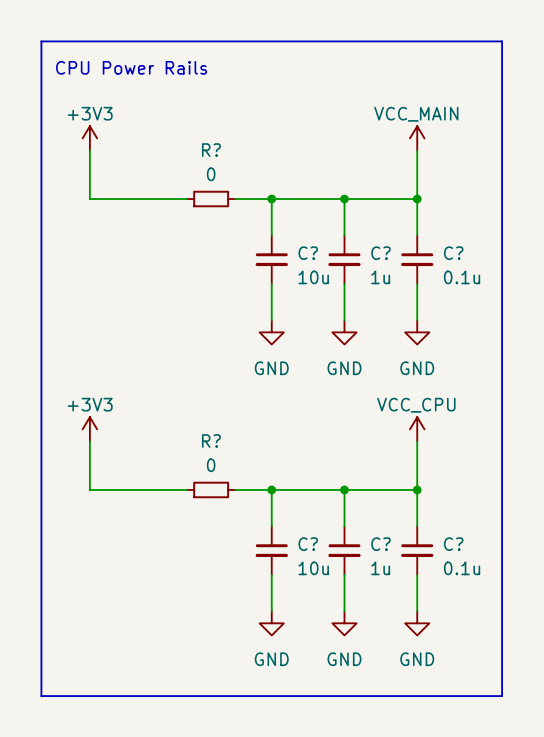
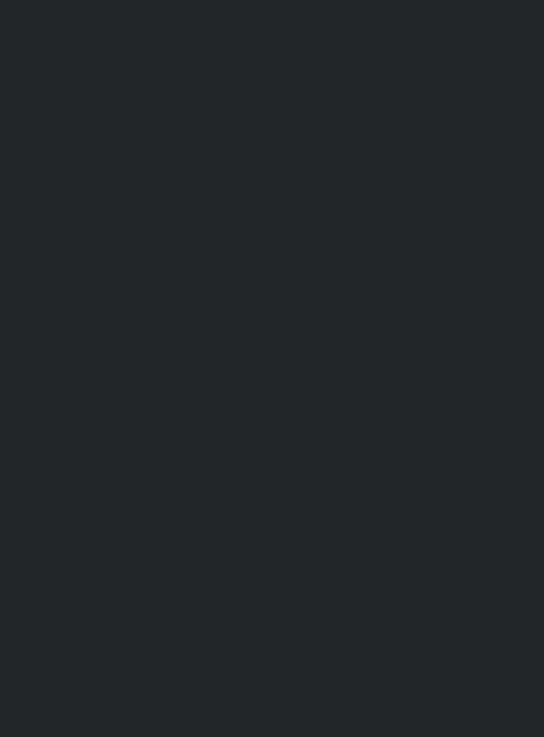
line: (41, 41) (502, 41) (502, 696) (41, 696) (41, 41) -> none
text: CPU Power Rails (131, 67) -> none
power symbol: +3V3 (89, 138) -> none
power symbol: VCC_MAIN (417, 138) -> none
wire: (89, 150) (89, 199) (186, 199) -> none
wire: (417, 150) (417, 235) -> none
R?: 0 (211, 199) -> none
wire: (235, 199) (417, 199) -> none
wire: (271, 199) (271, 235) -> none
junction: (271, 199) -> none
wire: (344, 199) (344, 235) -> none
junction: (344, 199) -> none
junction: (417, 199) -> none
C?: 10u (271, 259) -> none
C?: 1u (344, 259) -> none
C?: 0.1u (417, 259) -> none
wire: (271, 283) (271, 320) -> none
wire: (344, 283) (344, 320) -> none
wire: (417, 283) (417, 320) -> none
power symbol: GND (271, 332) -> none
power symbol: GND (344, 332) -> none
power symbol: GND (417, 332) -> none
power symbol: +3V3 (89, 429) -> none
power symbol: VCC_CPU (417, 429) -> none
wire: (89, 441) (89, 489) (186, 489) -> none
wire: (417, 441) (417, 526) -> none
R?: 0 (211, 489) -> none
wire: (235, 489) (417, 489) -> none
wire: (271, 489) (271, 526) -> none
junction: (271, 489) -> none
wire: (344, 489) (344, 526) -> none
junction: (344, 489) -> none
junction: (417, 489) -> none
C?: 10u (271, 550) -> none
C?: 1u (344, 550) -> none
C?: 0.1u (417, 550) -> none
wire: (271, 574) (271, 611) -> none
wire: (344, 574) (344, 611) -> none
wire: (417, 574) (417, 611) -> none
power symbol: GND (271, 623) -> none
power symbol: GND (344, 623) -> none
power symbol: GND (417, 623) -> none

